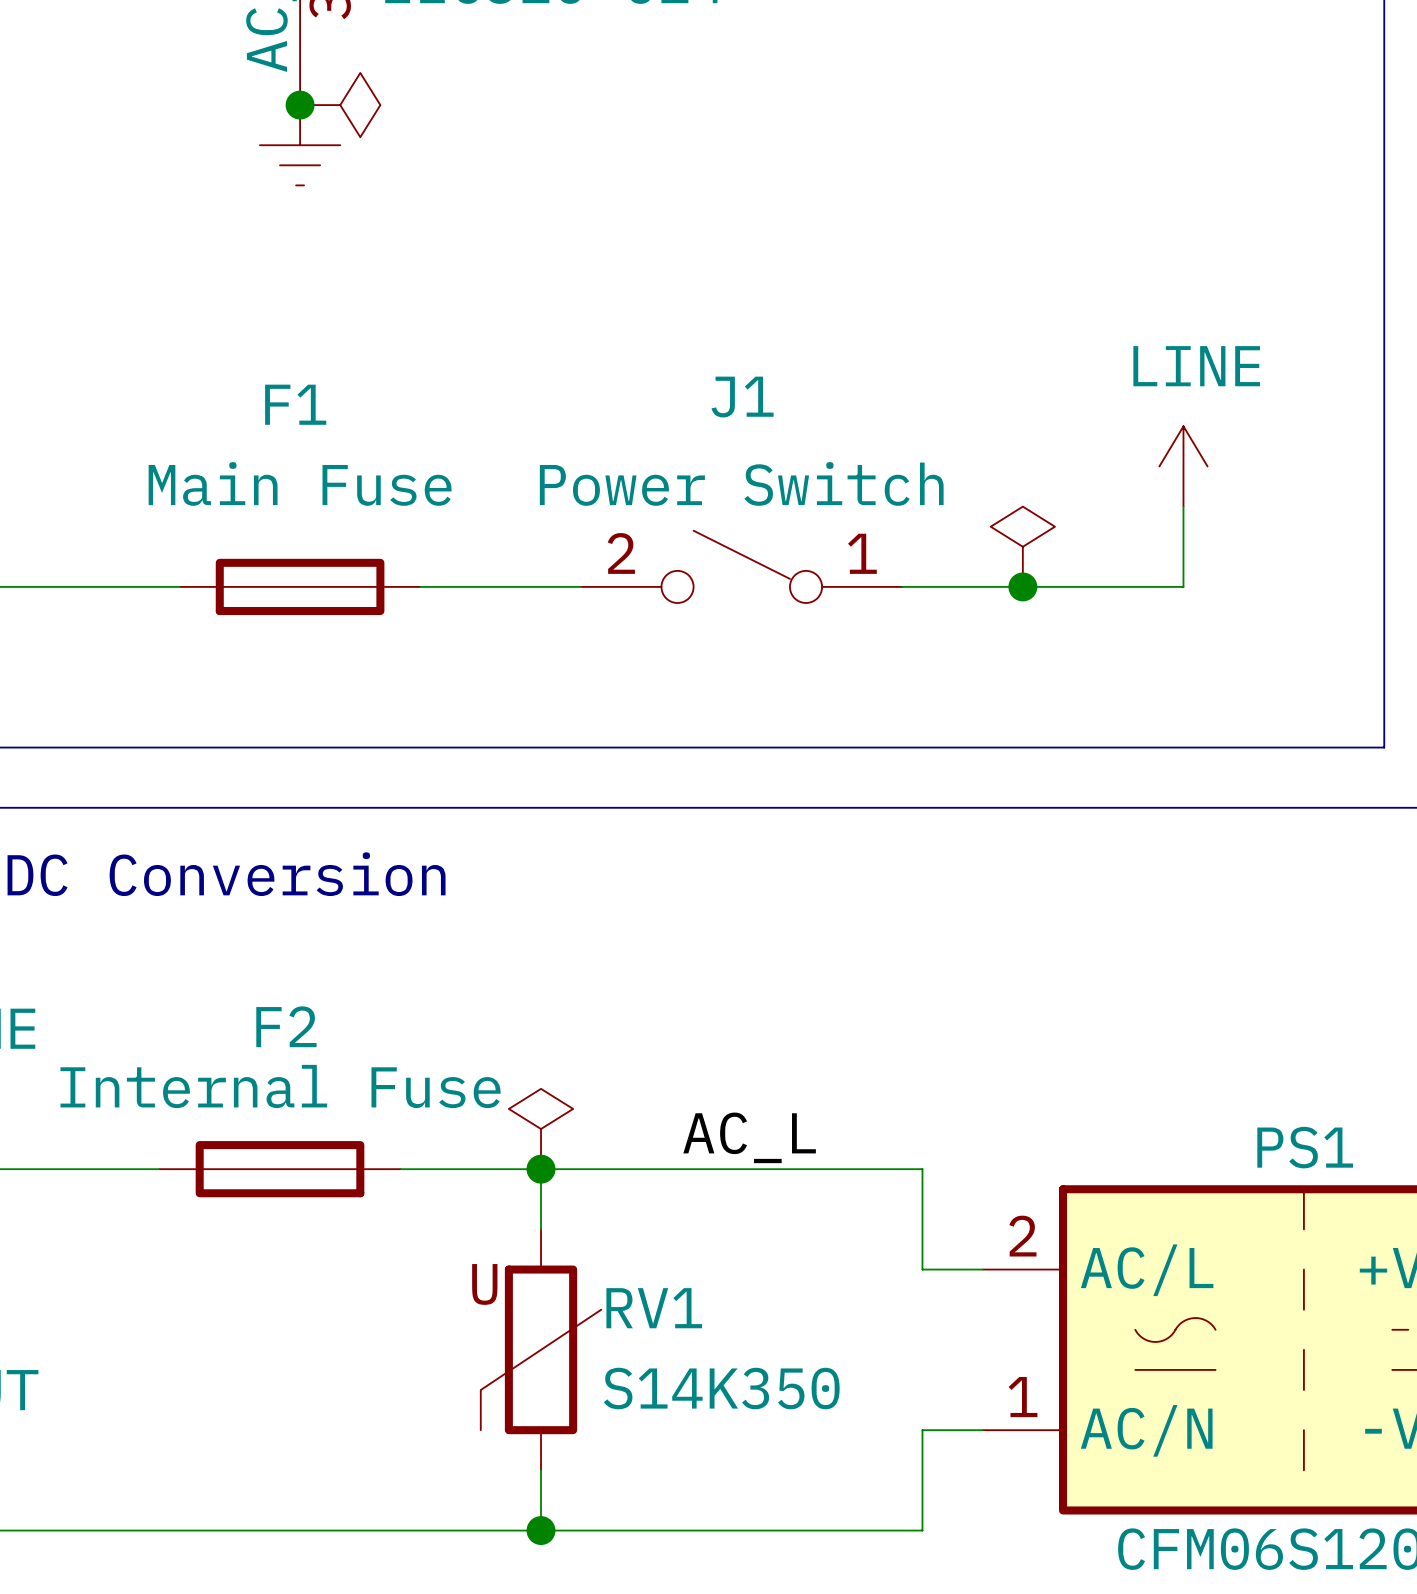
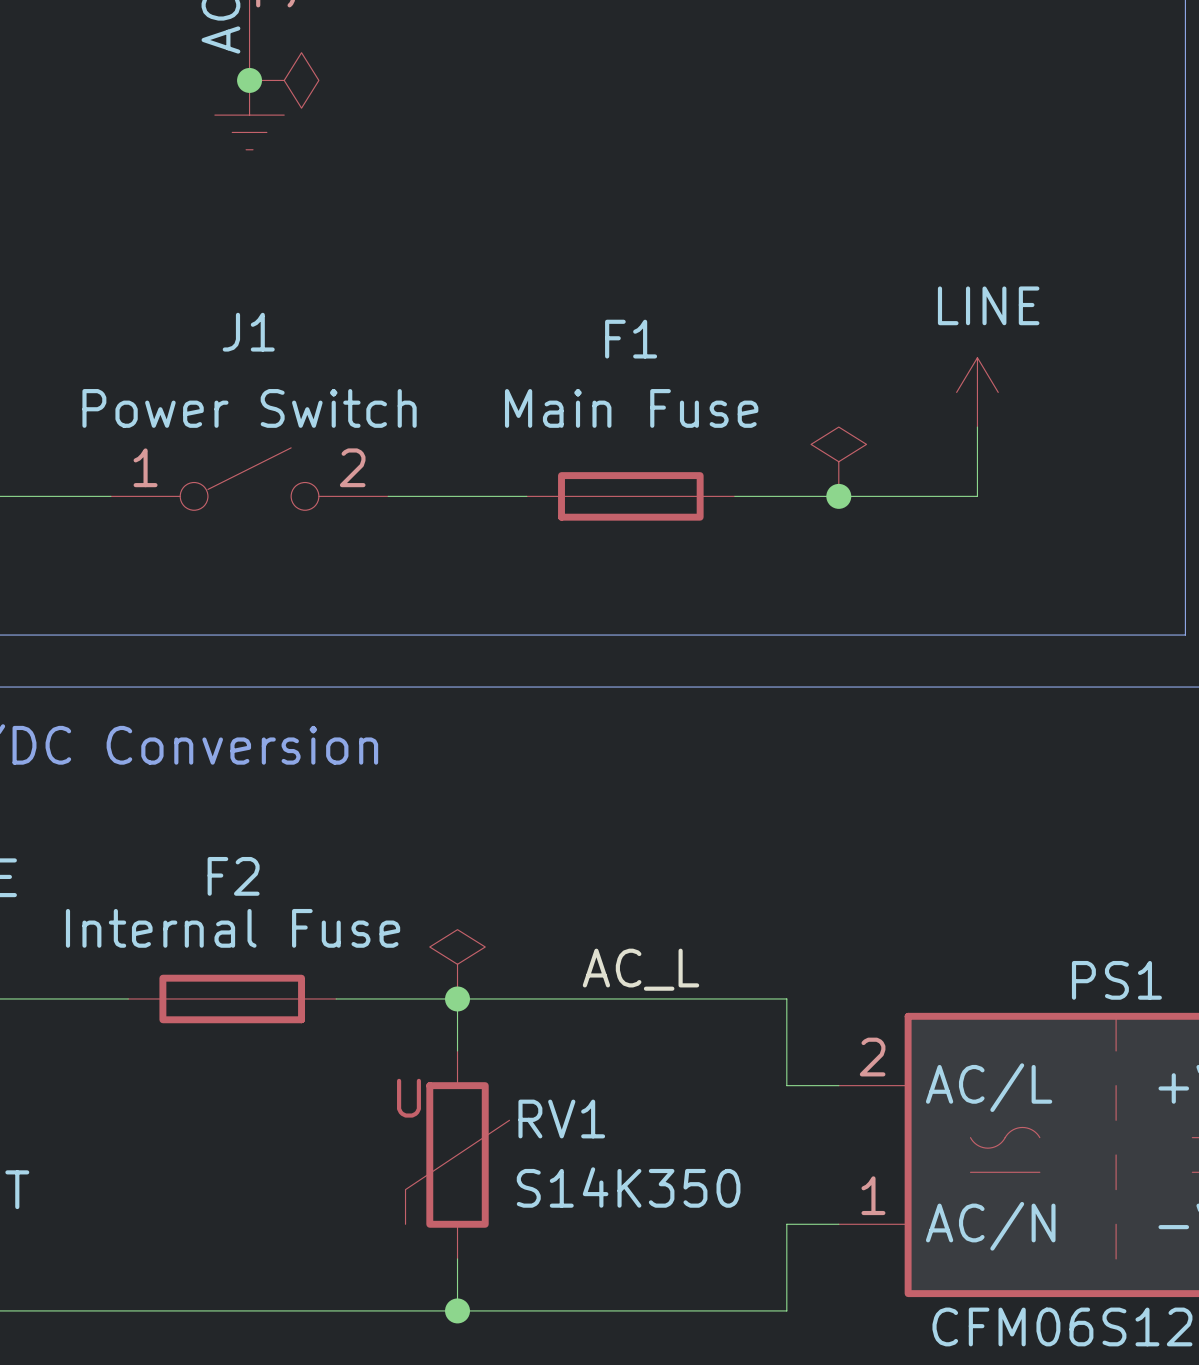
power symbol position: LINE (1183, 466) -> LINE (977, 392)
wire: (1183, 506) (1183, 586) (1143, 586) -> (977, 427) (977, 496)
power symbol position: (1022, 546) -> (838, 461)
J1 flip: as is (741, 566) -> left-right (249, 479)
J1 position: (741, 566) -> (249, 479)
F1 position: (300, 586) -> (630, 496)
junction position: (1022, 586) -> (838, 496)

